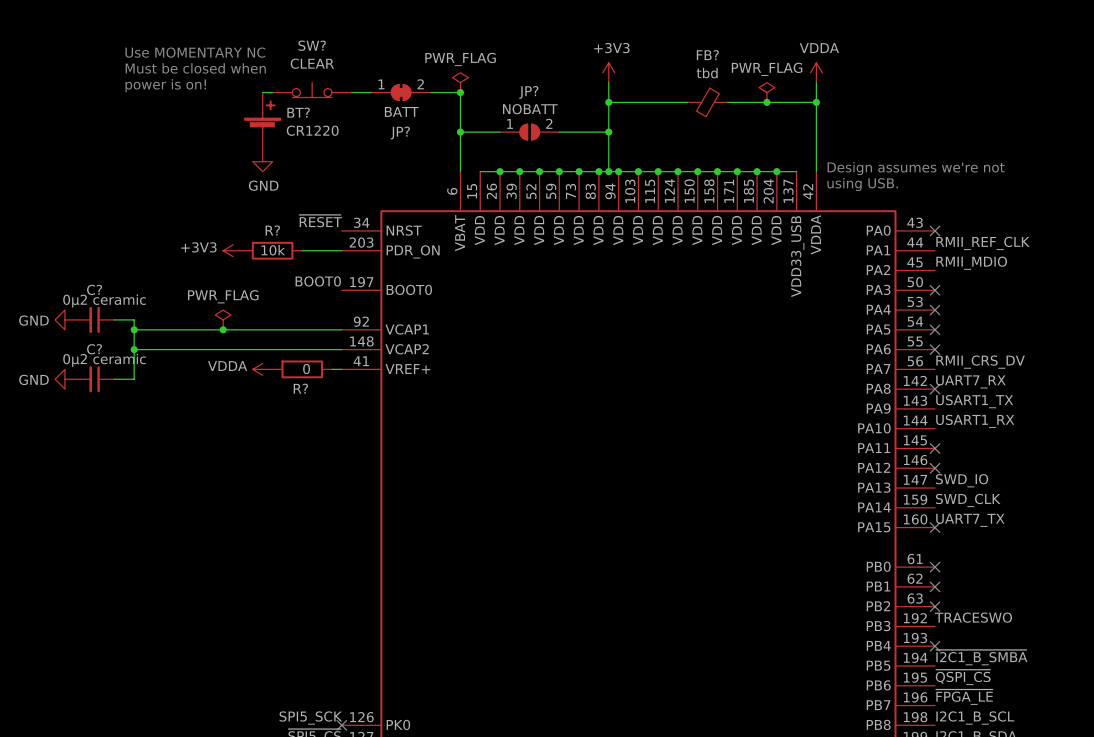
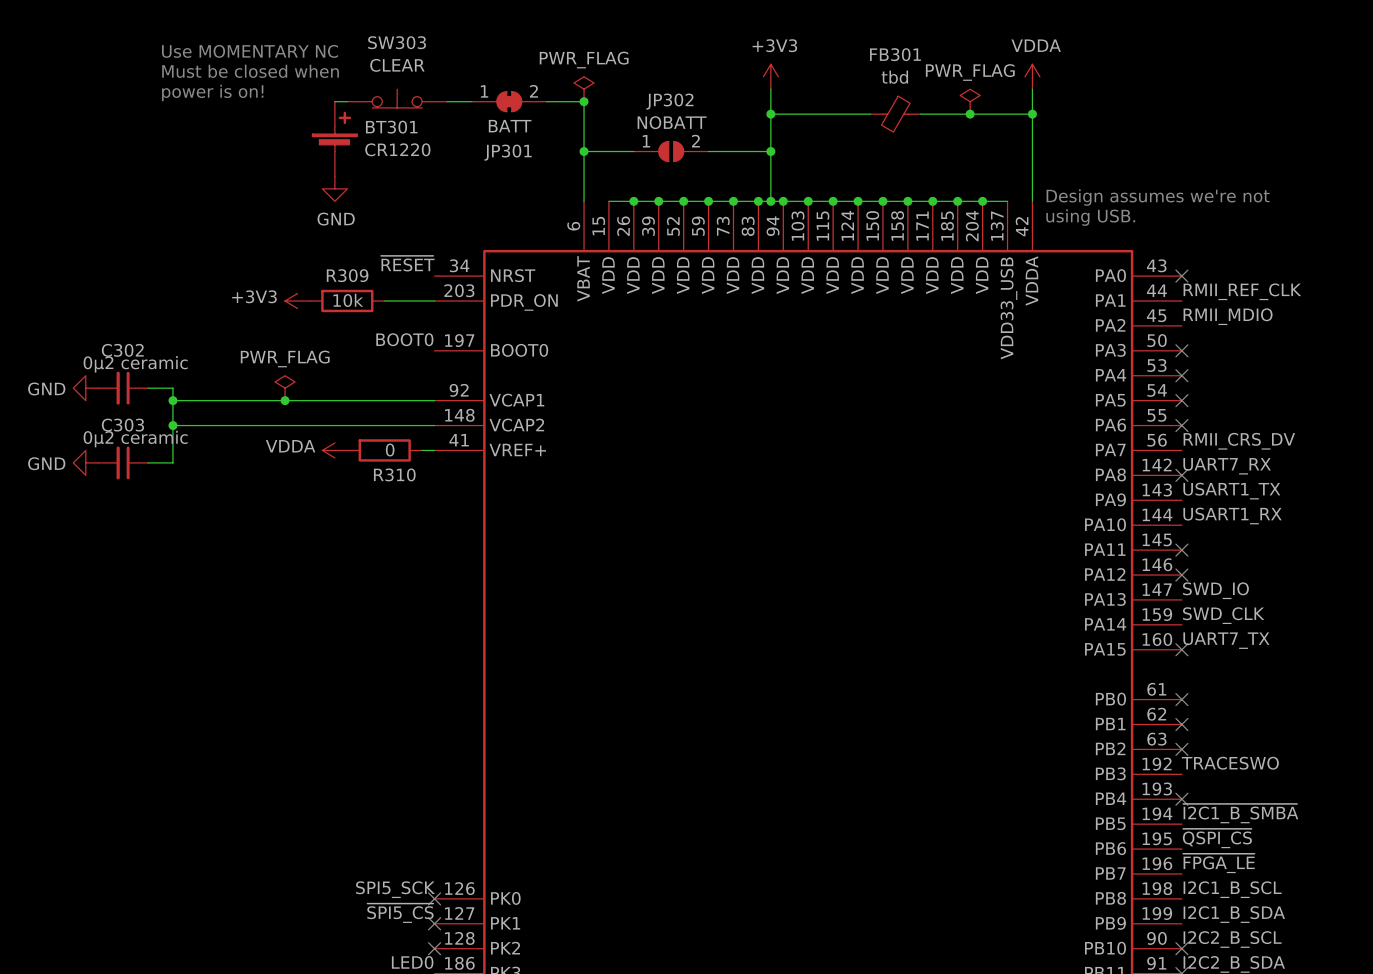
SW? name: SW? (312, 45) -> SW303 (397, 42)
FB? name: FB? (707, 55) -> FB301 (895, 54)
JP? name: JP? (528, 92) -> JP302 (669, 101)
BT? name: BT? (298, 112) -> BT301 (391, 127)
JP? name: JP? (400, 132) -> JP301 (508, 152)
R? name: R? (272, 230) -> R309 (347, 275)
C? name: C? (94, 289) -> C302 (122, 350)
C? name: C? (94, 349) -> C303 (122, 425)
R? name: R? (300, 388) -> R310 (394, 474)

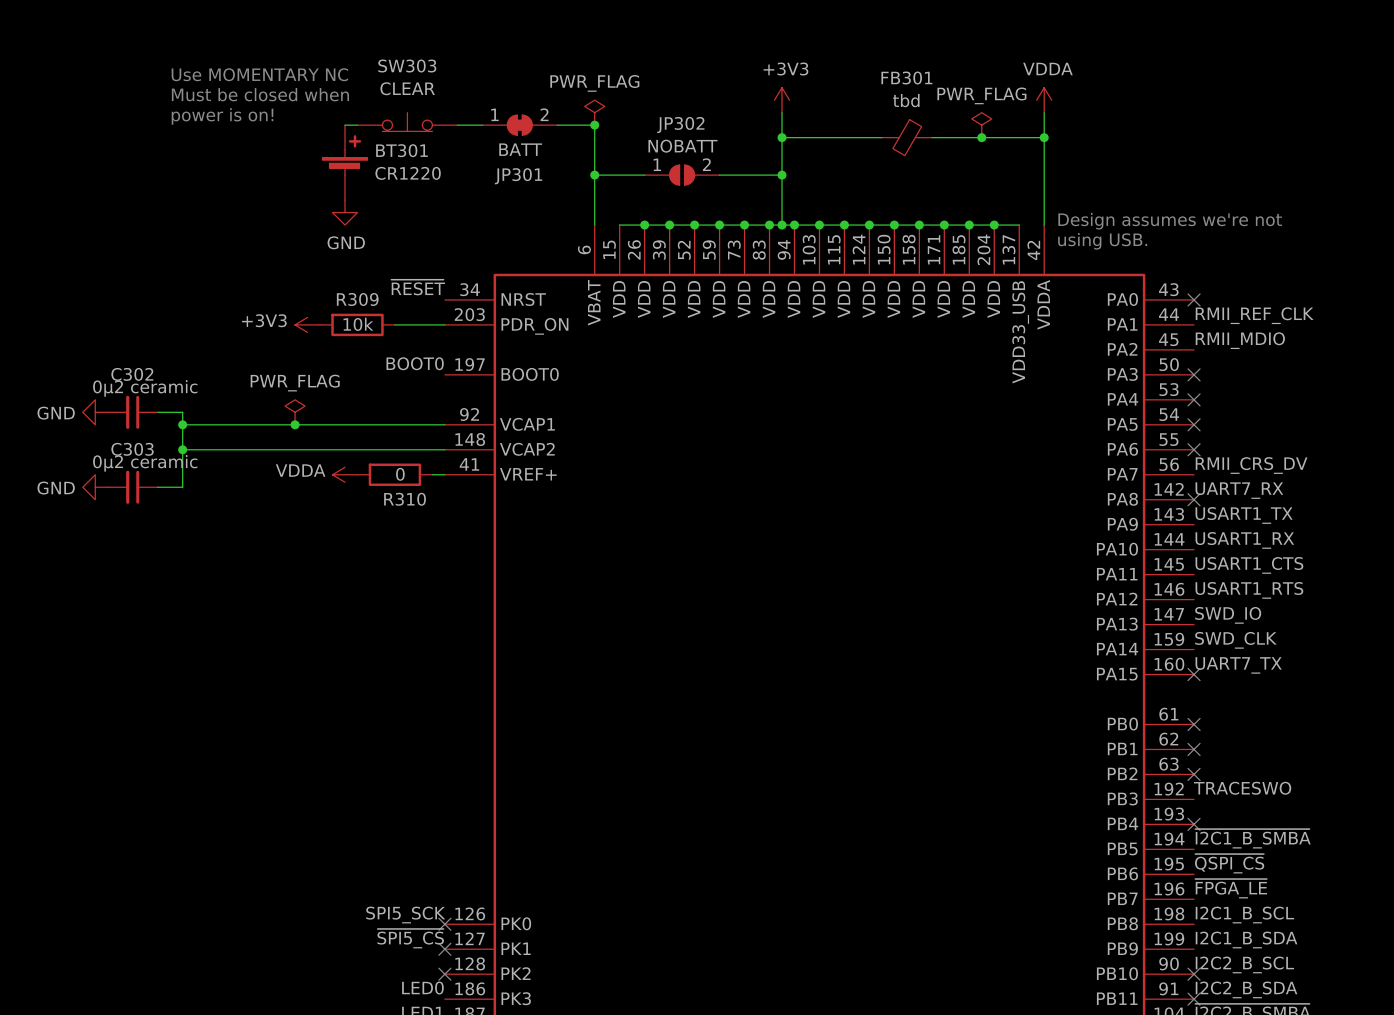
label: none -> USART1_CTS (1249, 565)
no-connect mark: (1181, 550) -> none
label: none -> USART1_RTS (1249, 590)
no-connect mark: (1181, 575) -> none

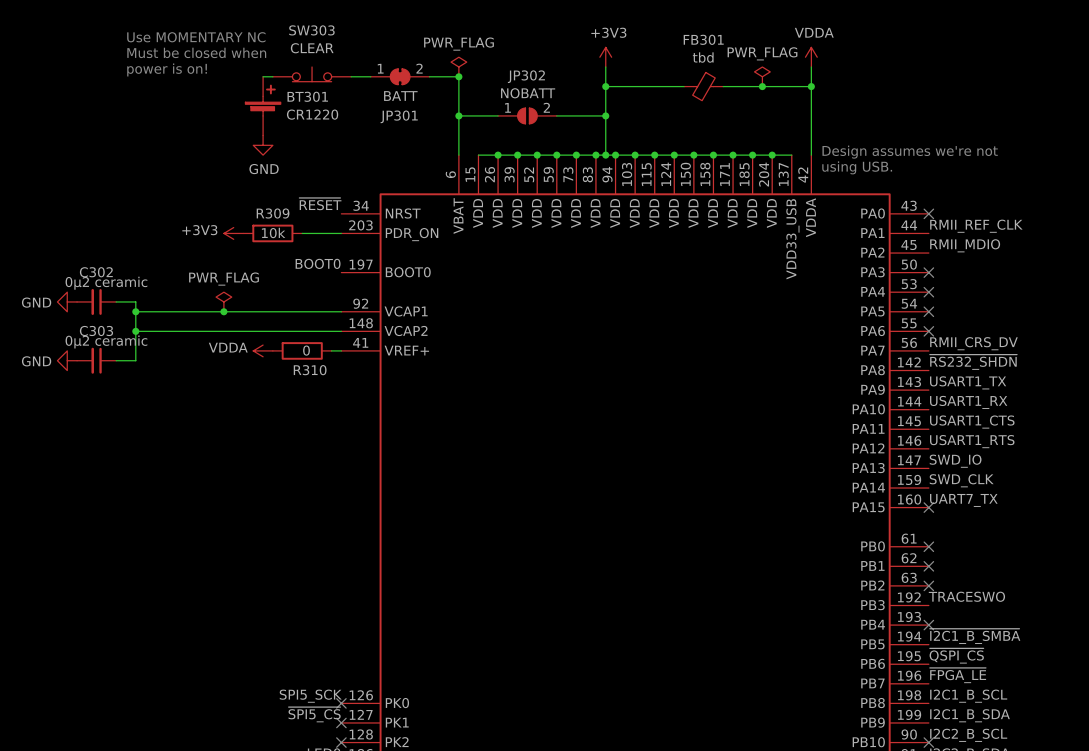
label: UART7_RX (1239, 490) -> ~{RS232_SHDN} (973, 362)
no-connect mark: (1194, 499) -> none

